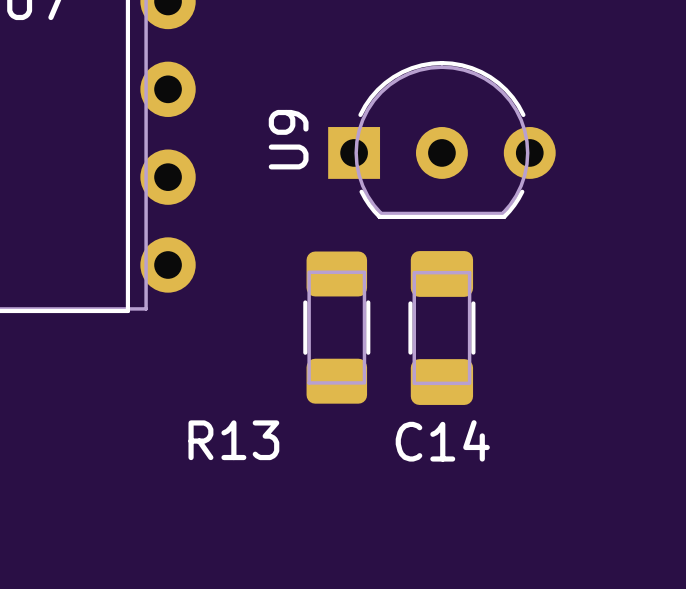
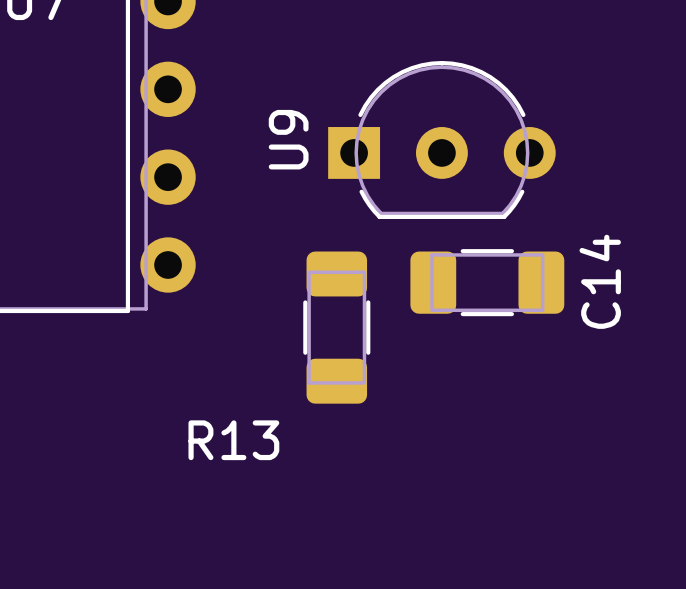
C14 rotation: 0° (441, 328) -> 90° clockwise (487, 282)
C14 name position: C14 (442, 440) -> C14 (600, 281)

